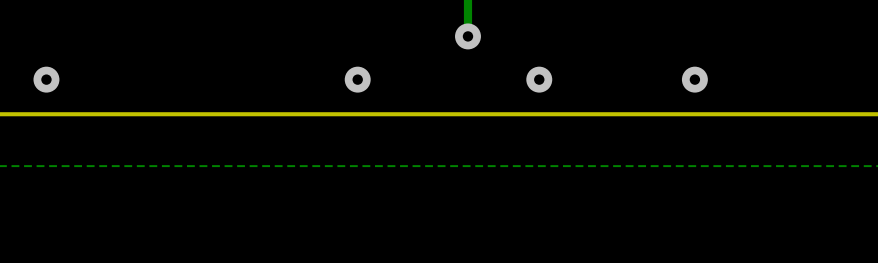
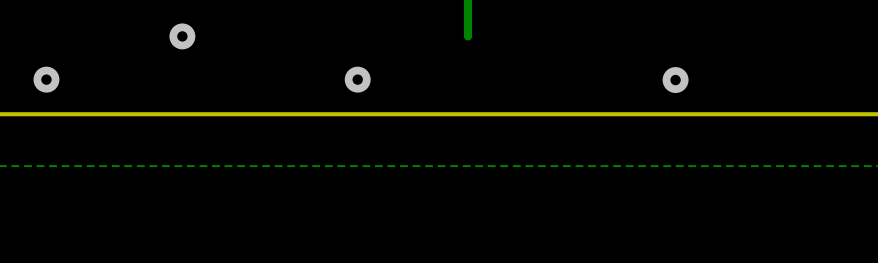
via: none -> (182, 36)
via: (467, 36) -> none
via: (539, 79) -> none
via position: (694, 79) -> (675, 80)

